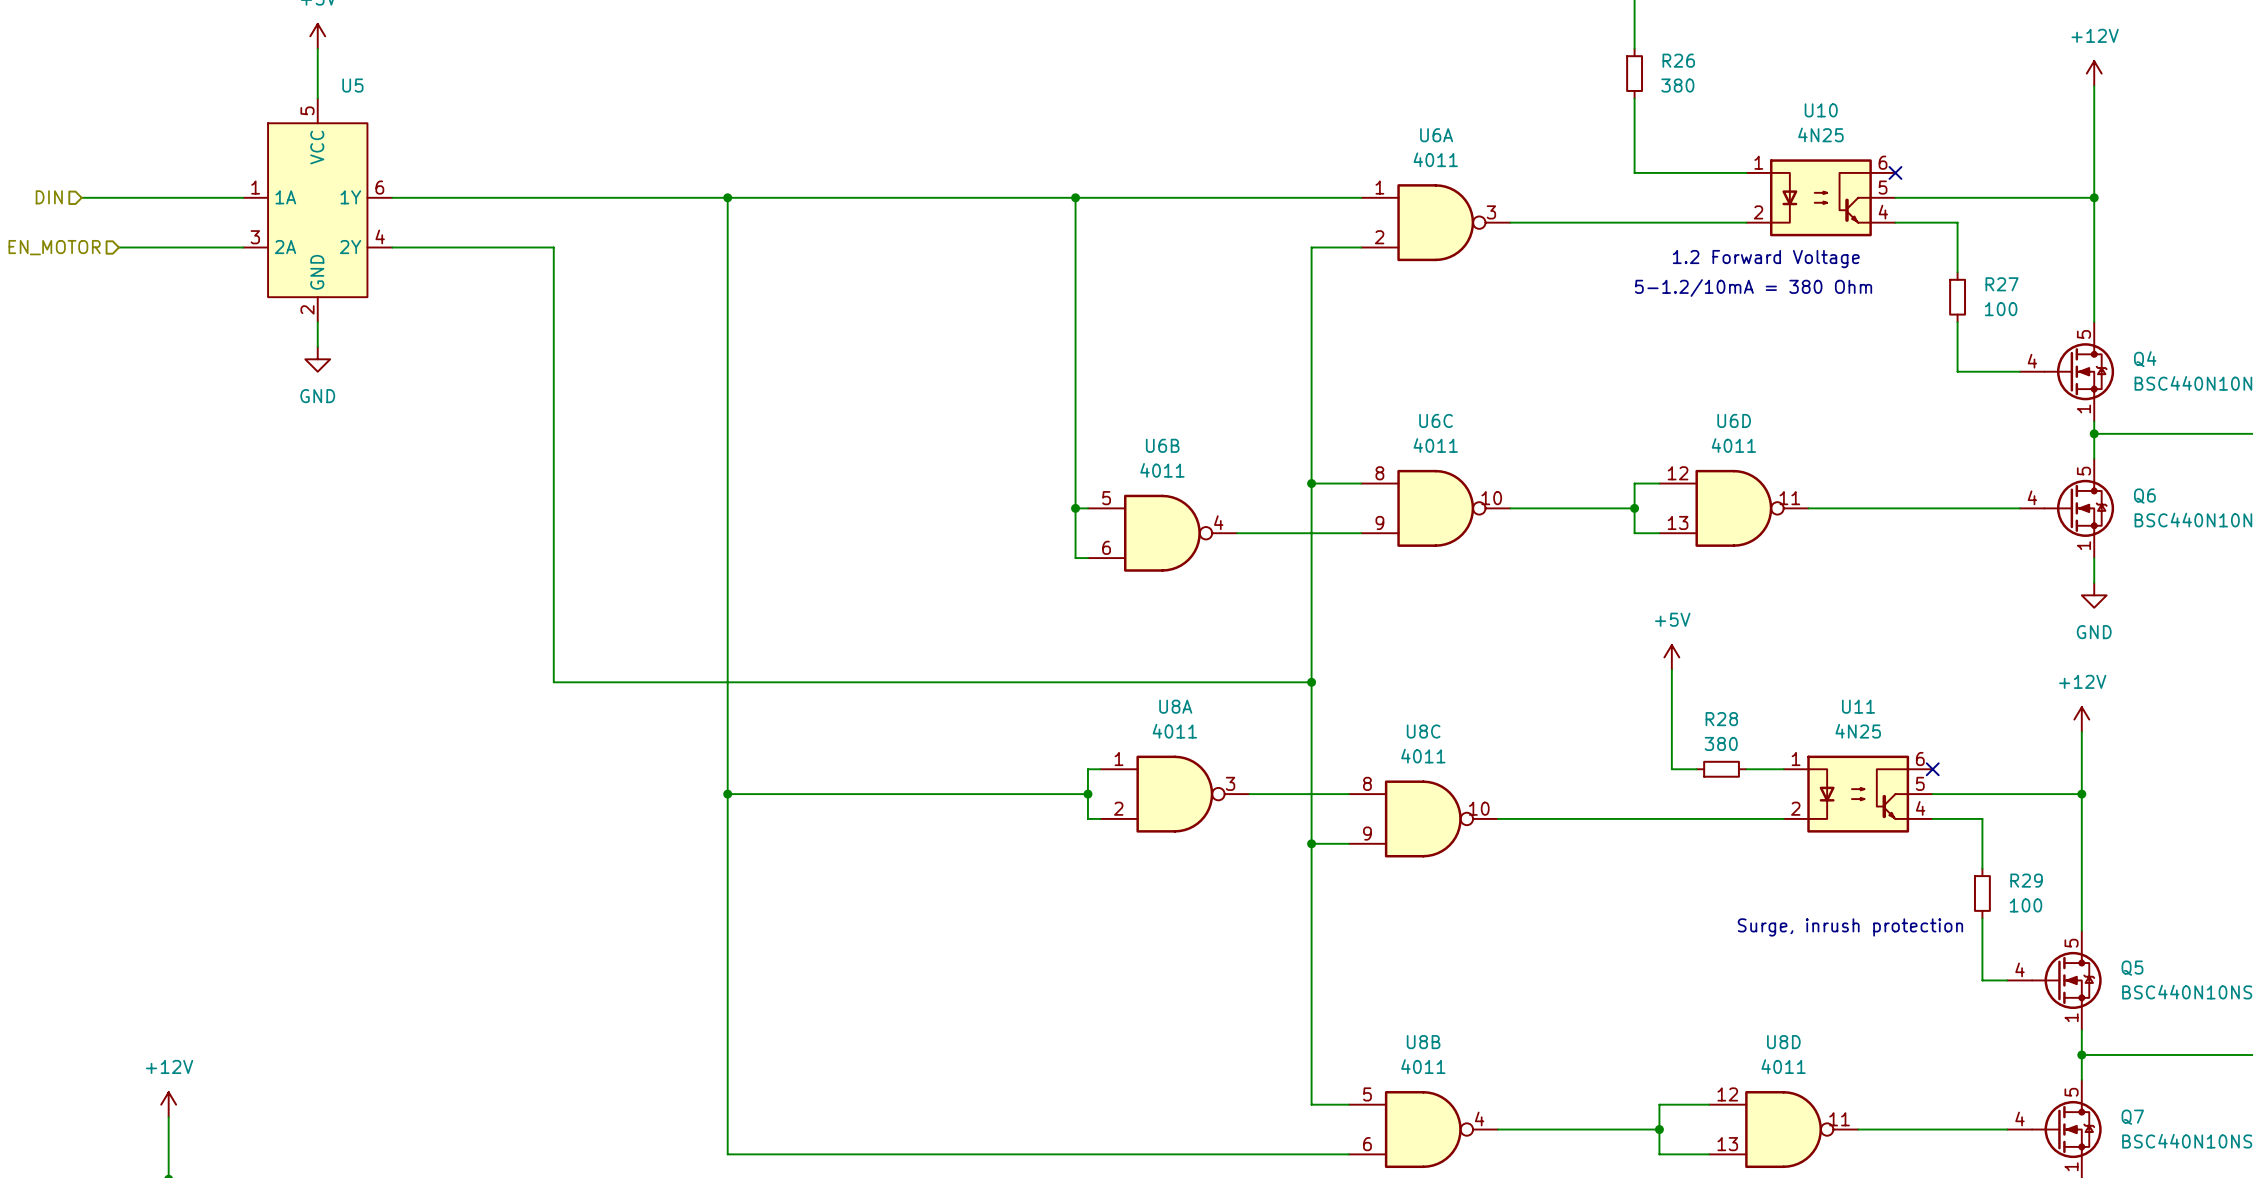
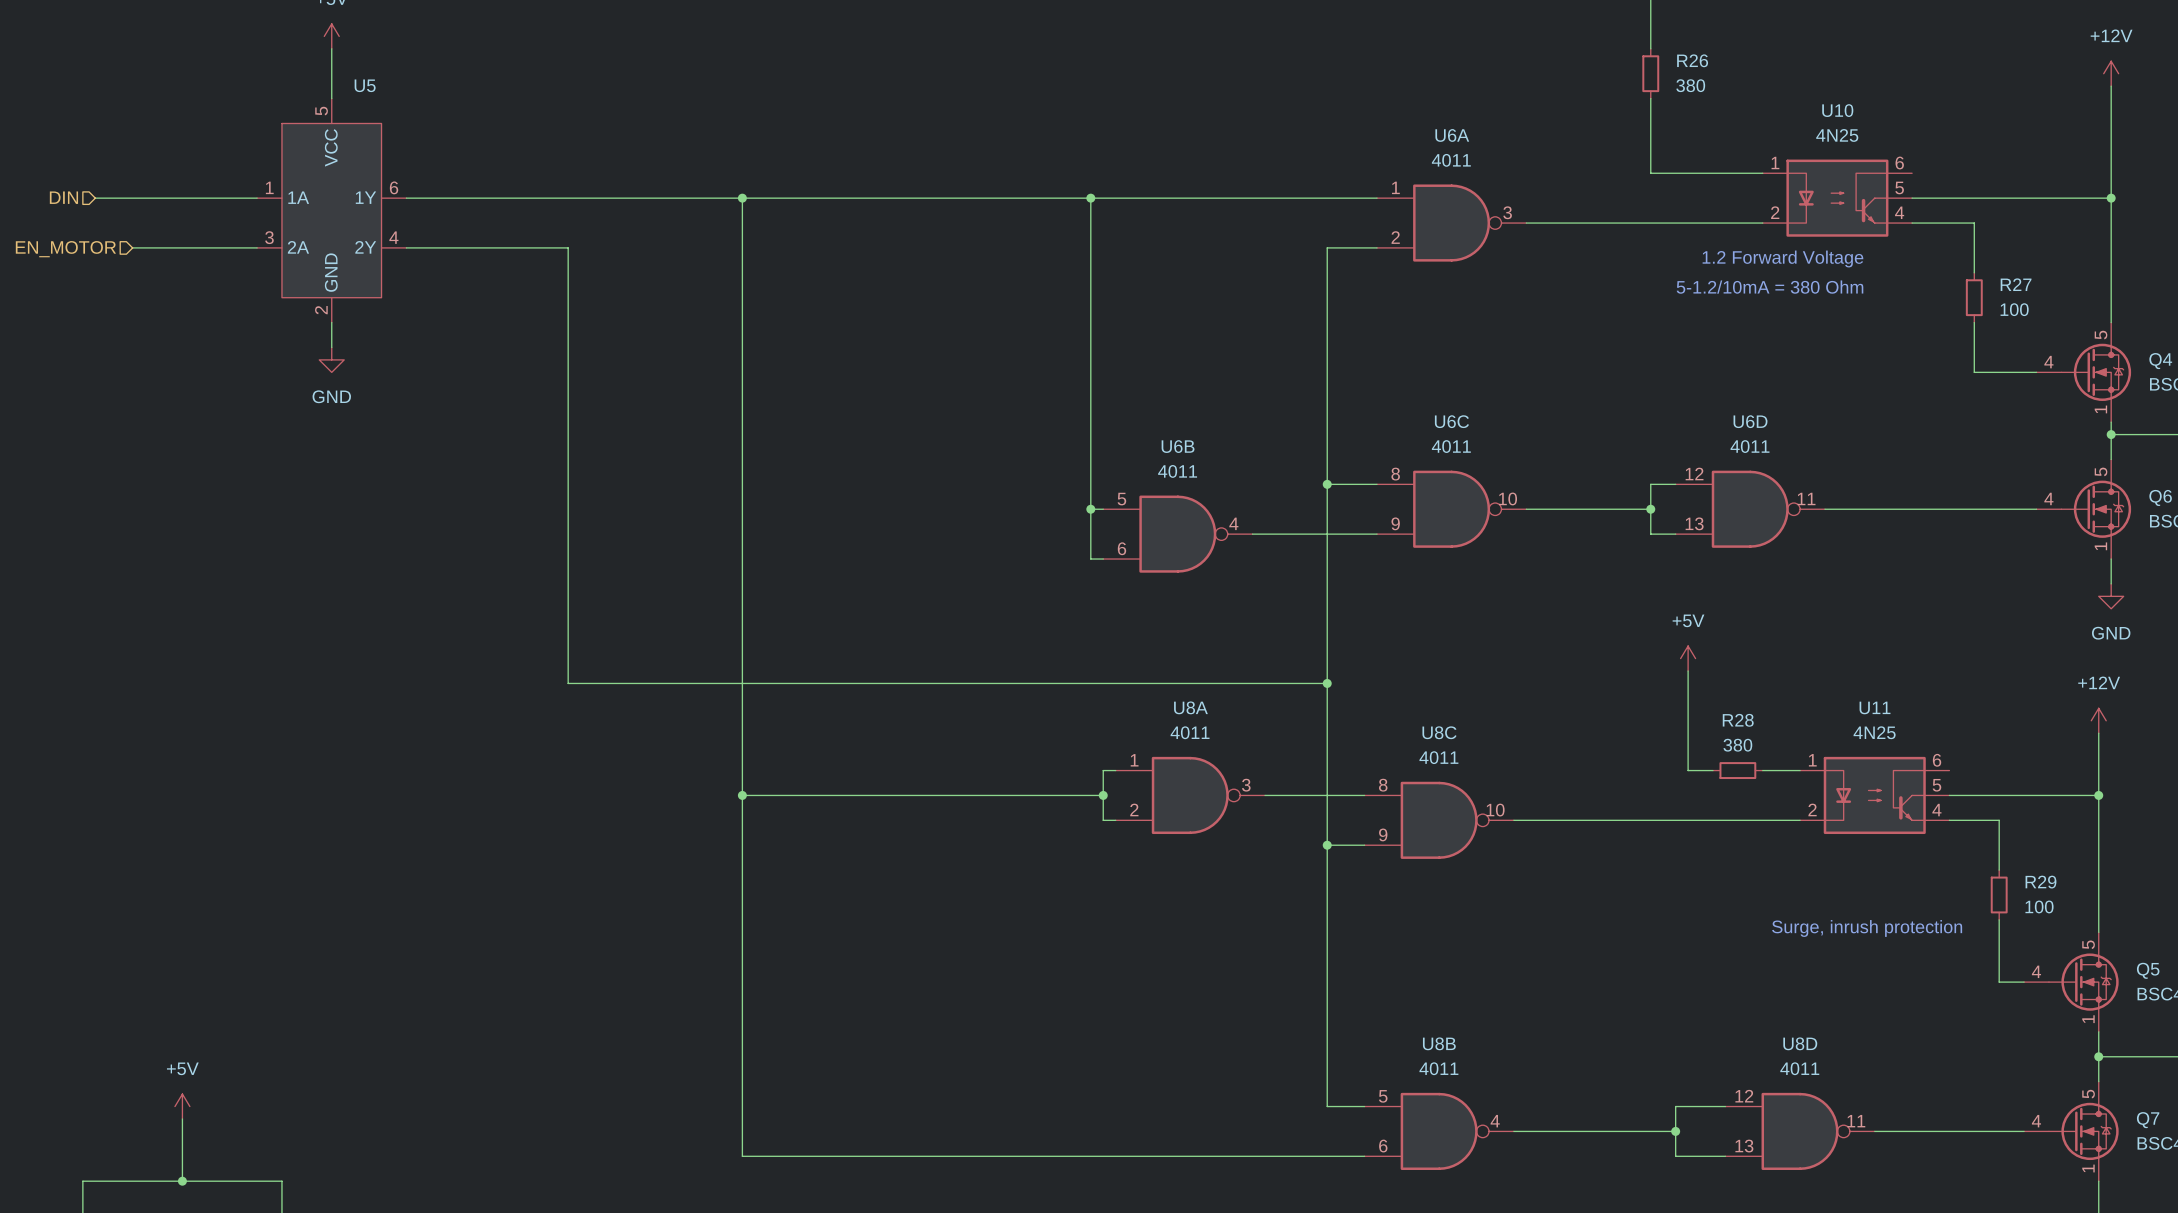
no-connect mark: (1895, 172) -> none
no-connect mark: (1932, 769) -> none
power symbol: +12V (168, 1104) -> +5V (182, 1106)

